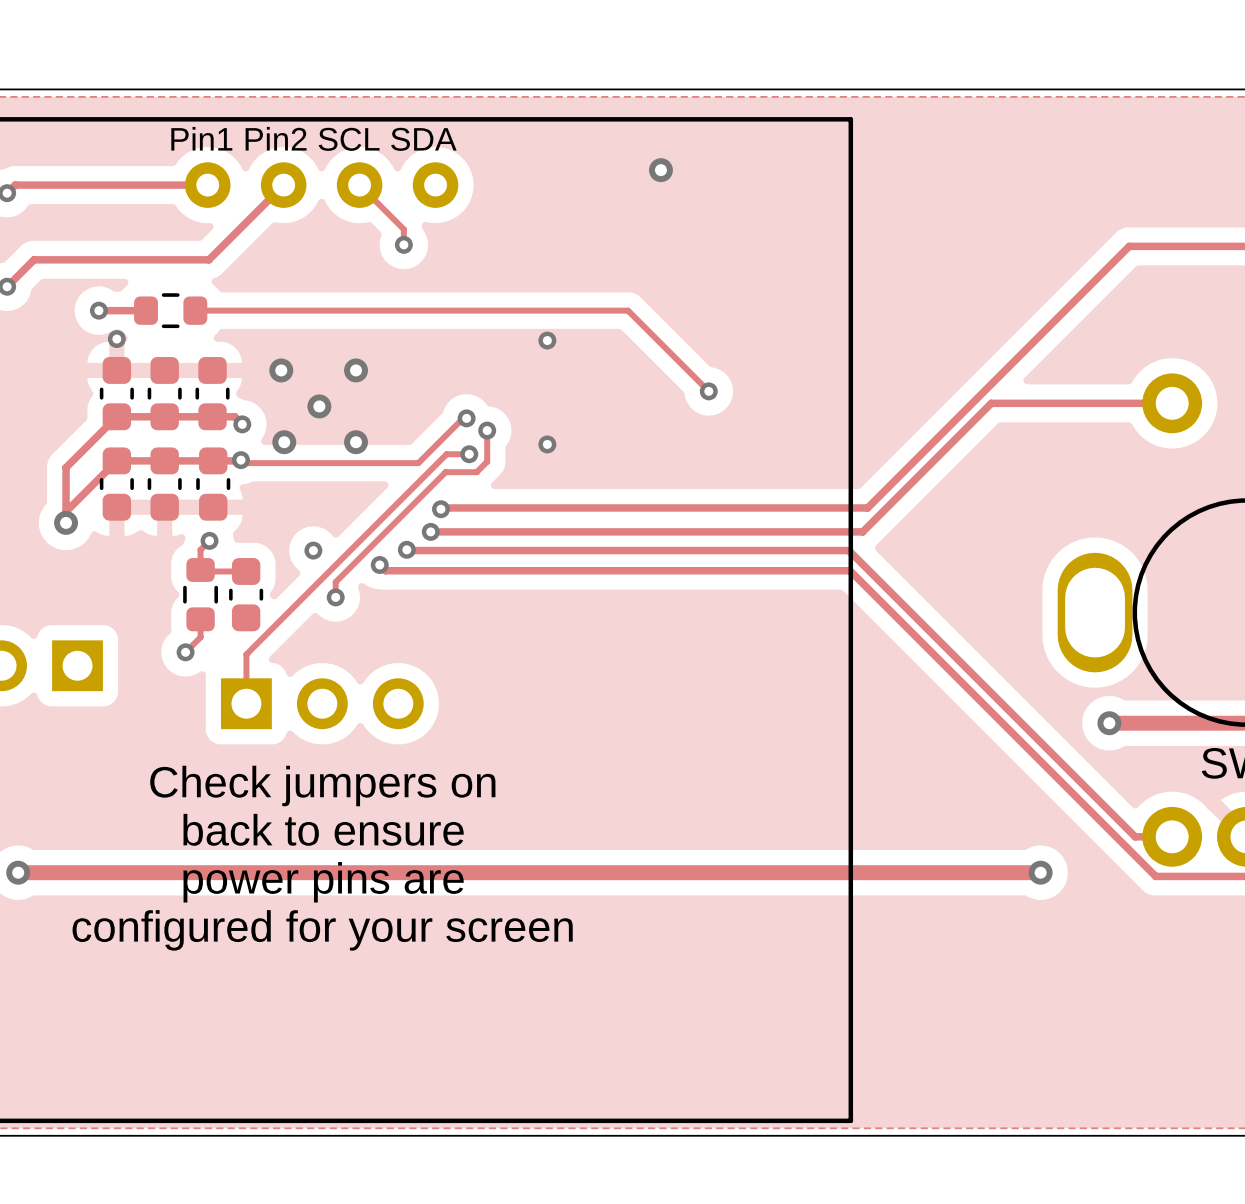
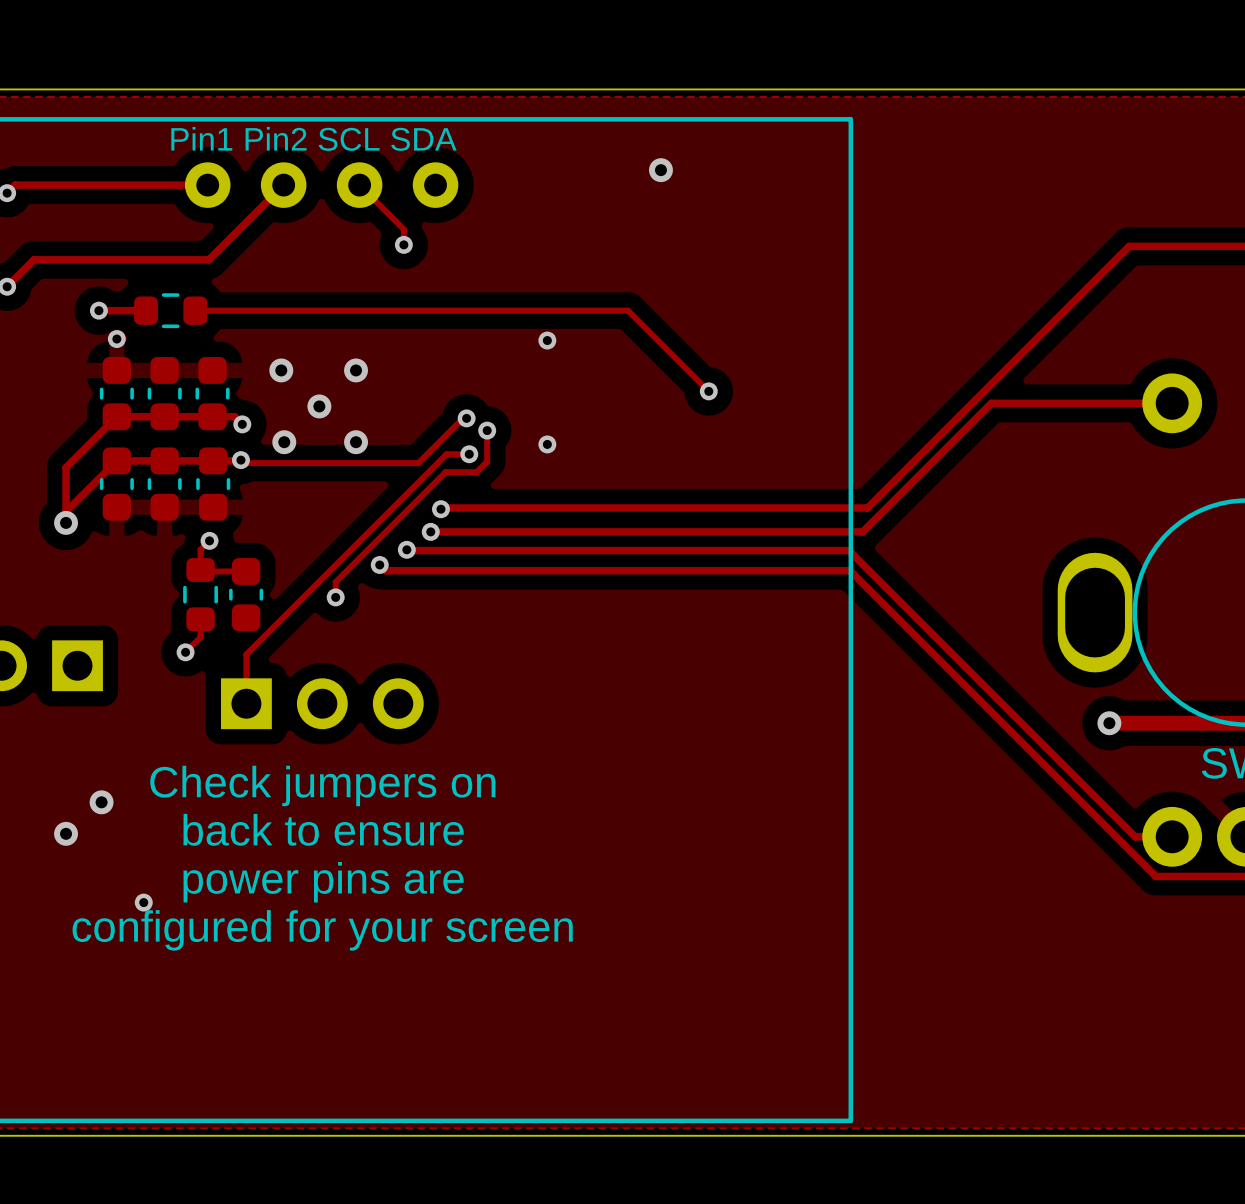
via: (313, 550) -> none
via: none -> (101, 802)
via: none -> (66, 833)
track: (18, 872) (1040, 872) -> none
via: (18, 872) -> none
via: (1040, 872) -> none
via: none -> (143, 902)

